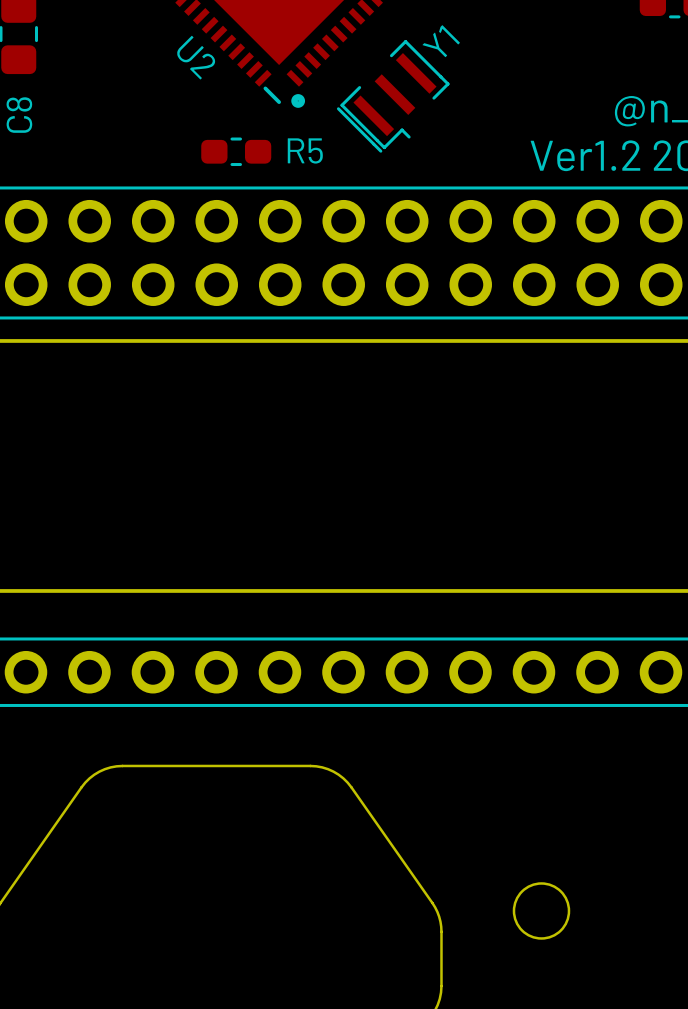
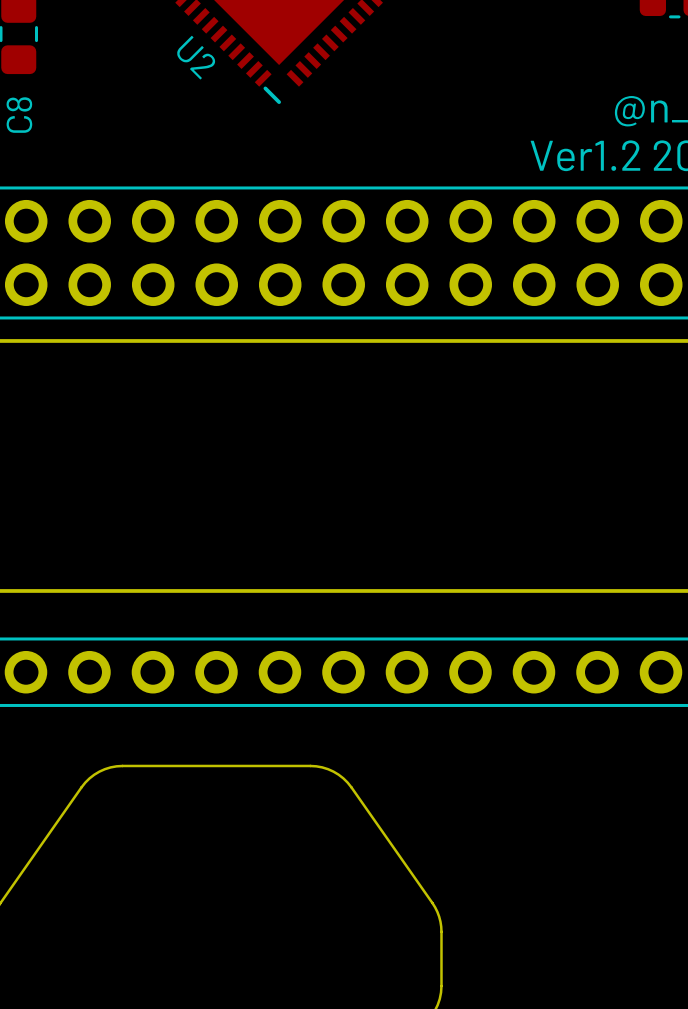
drawing: [291, 94, 306, 108] -> none
Y1: (393, 96) -> none
R5: (236, 151) -> none
round board edge: [512, 882, 571, 940] -> none

